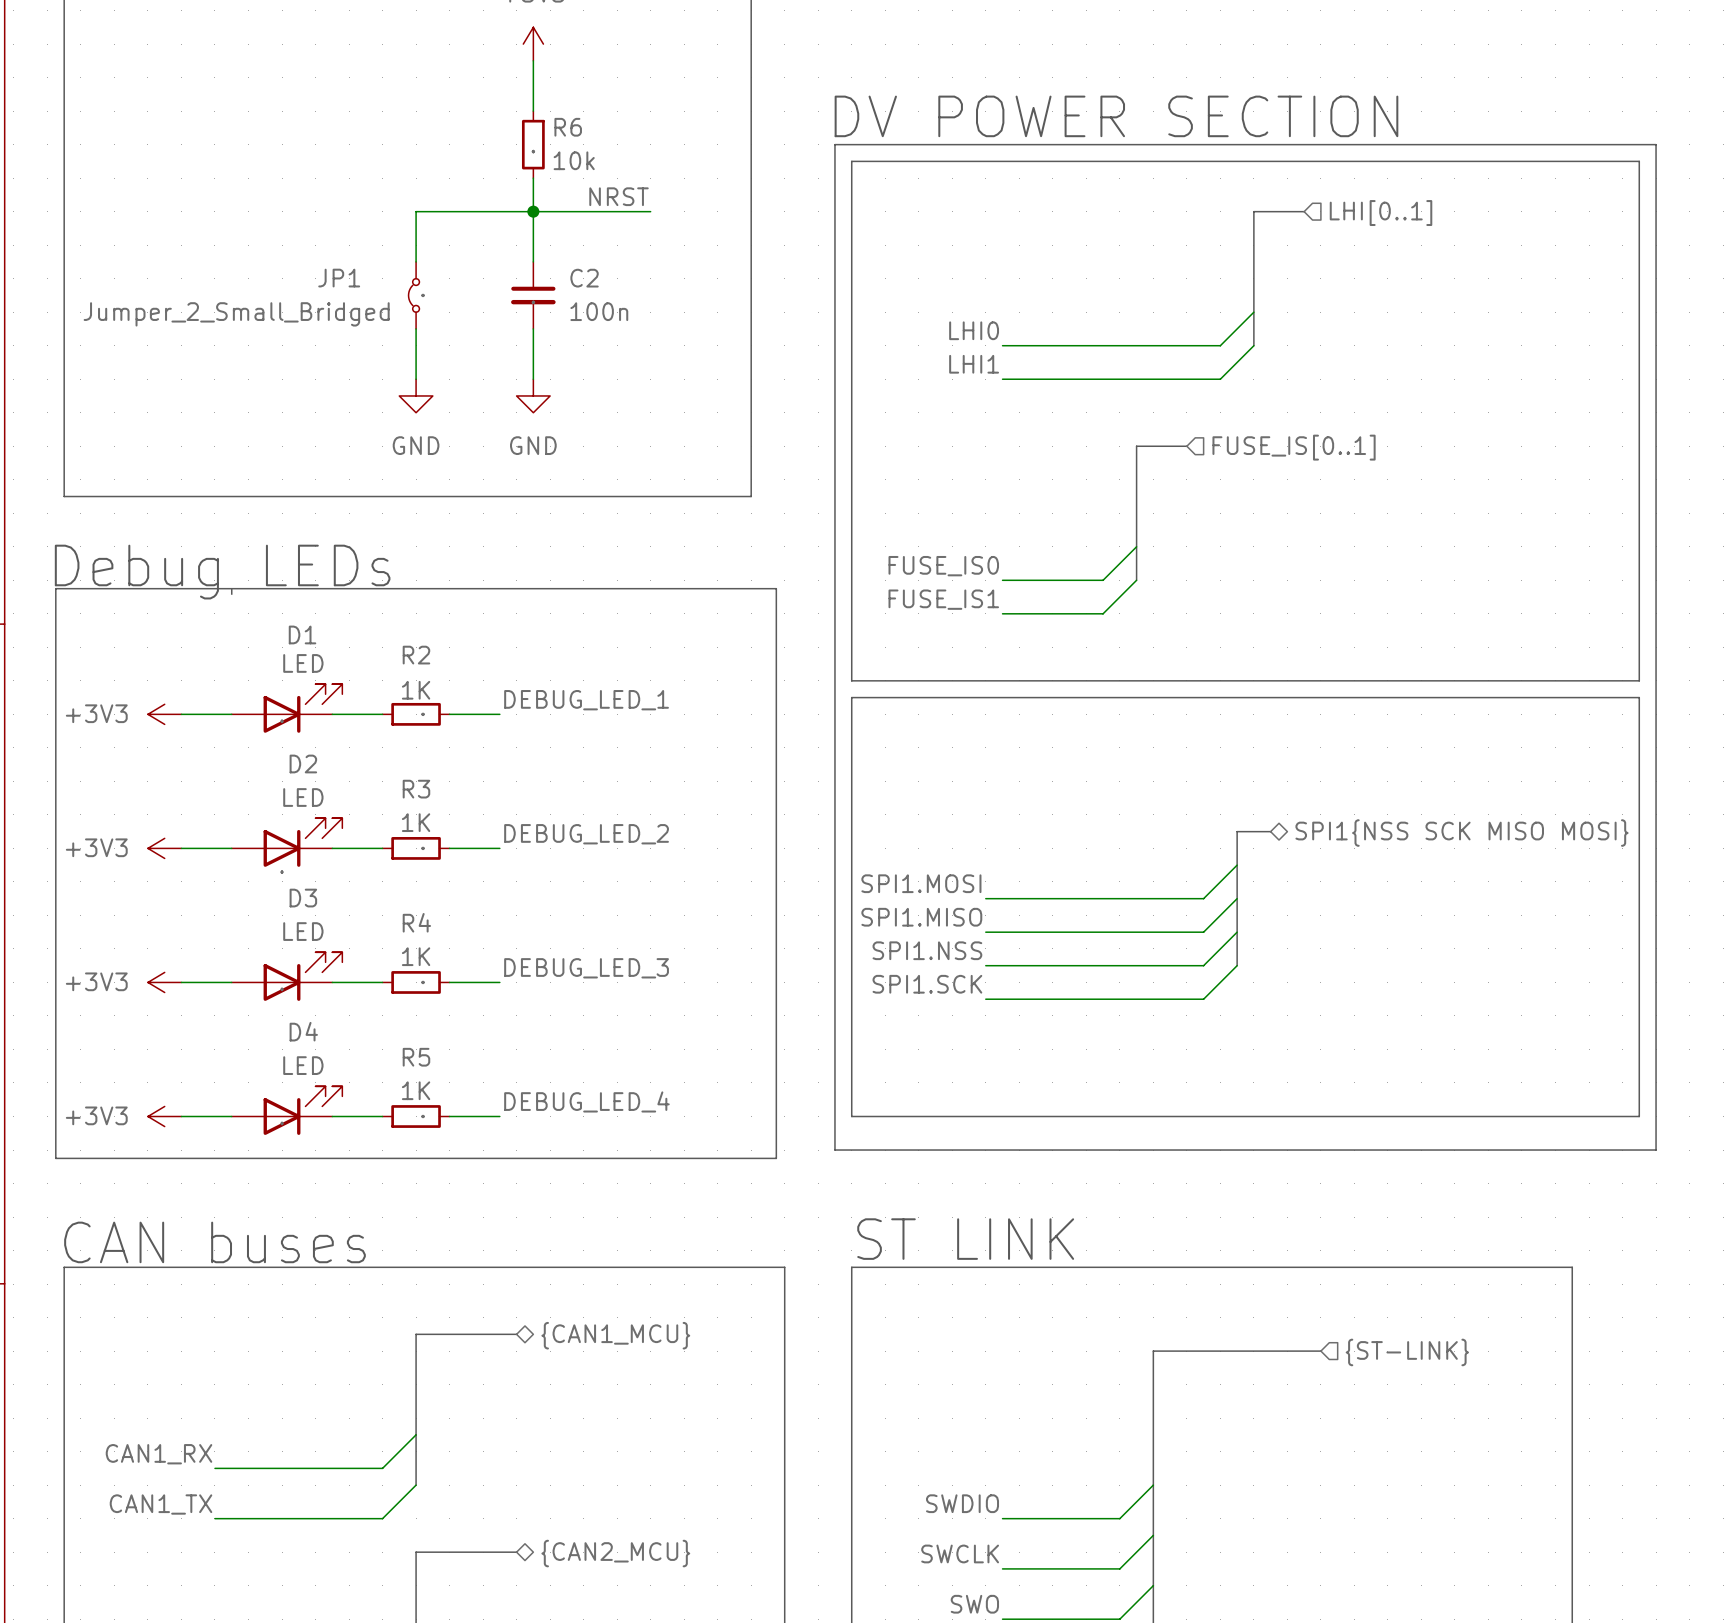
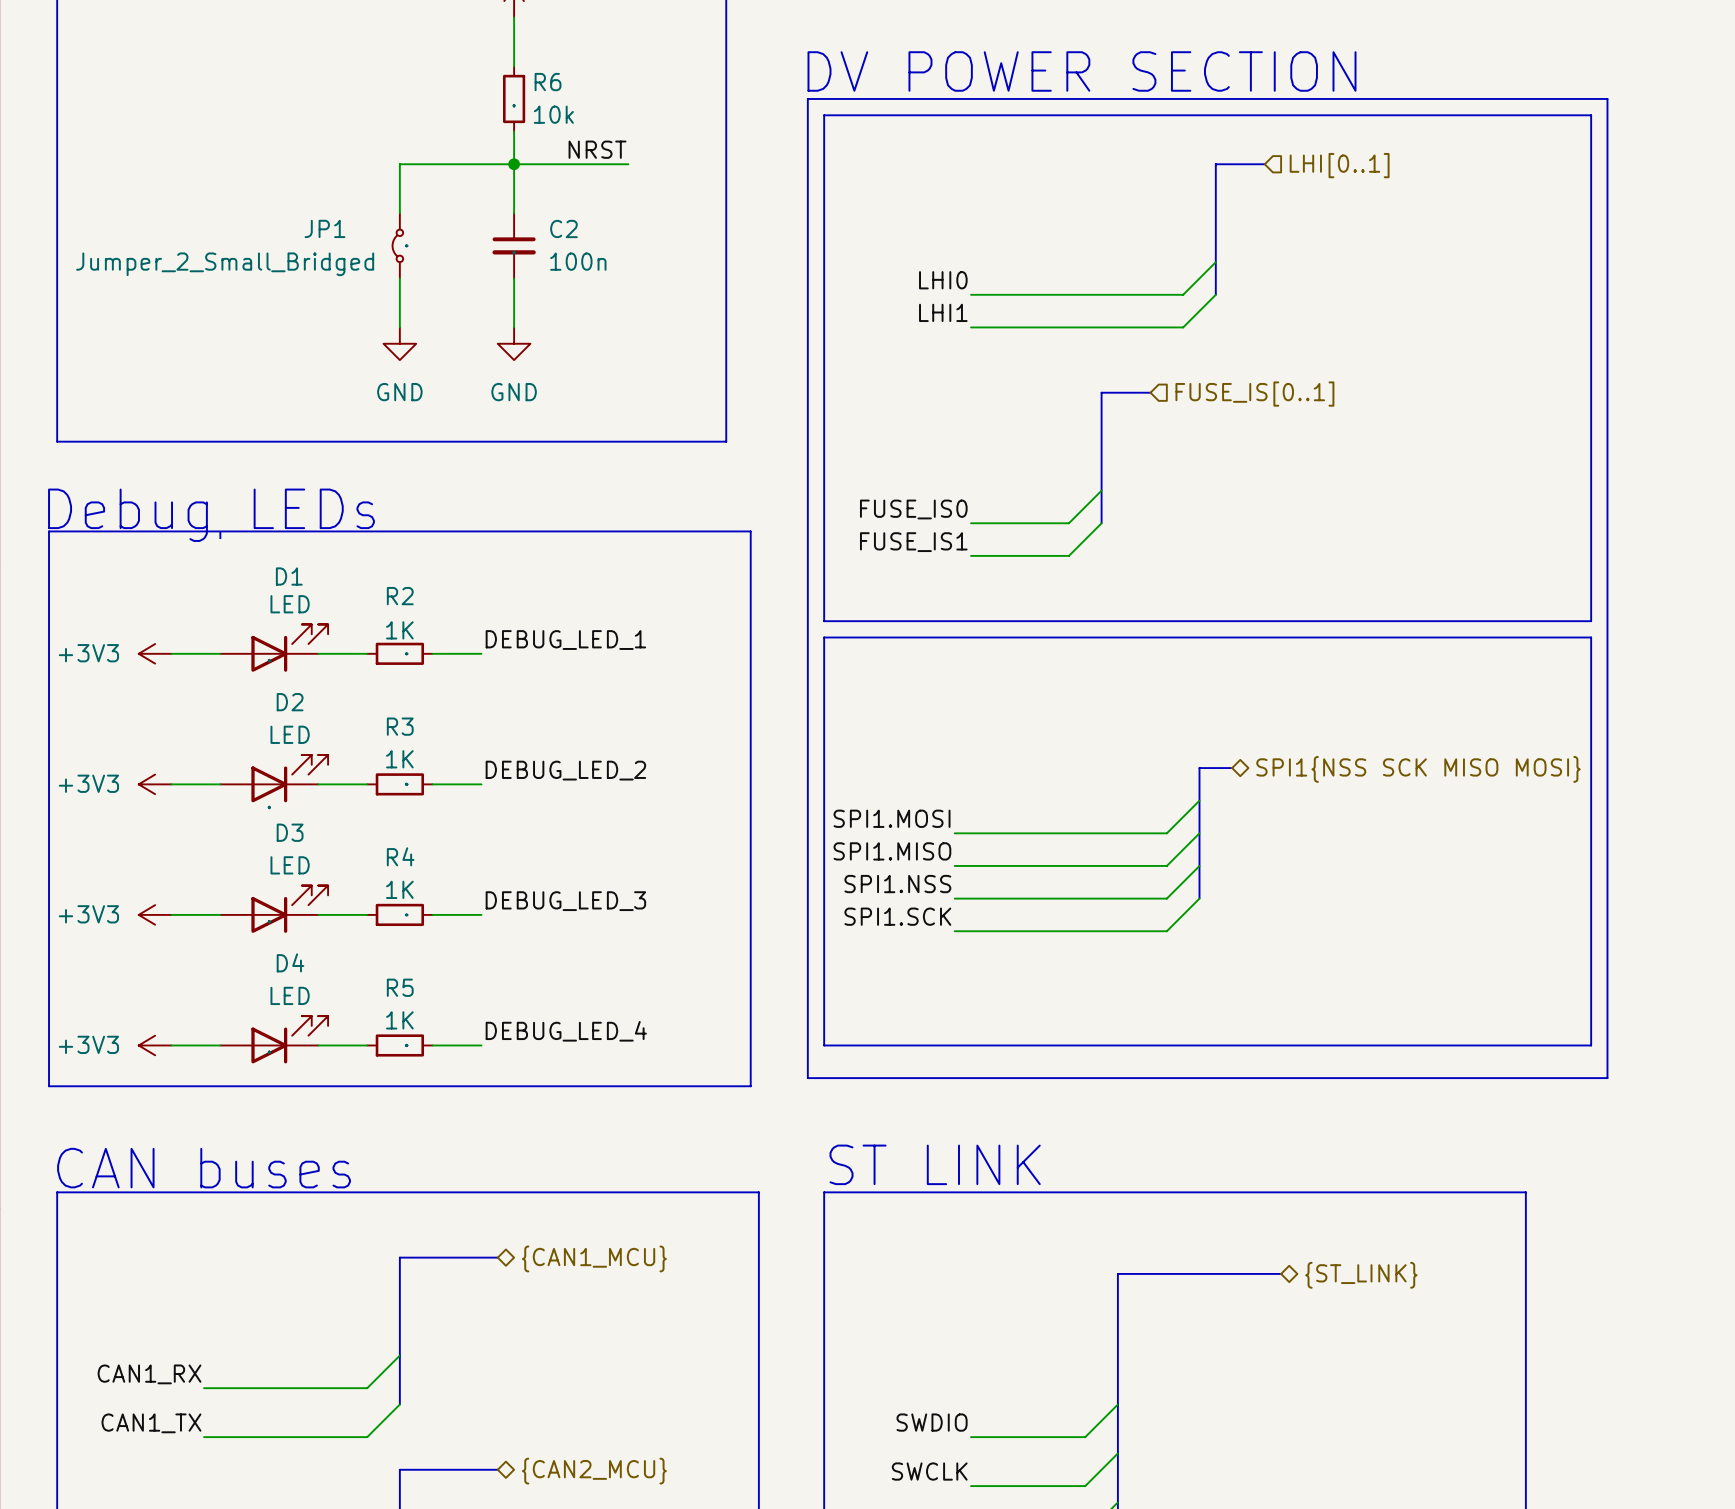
hierarchical label shape: input (1407, 1352) -> bidirectional (1361, 1275)
hierarchical label: {ST-LINK} (1407, 1352) -> {ST_LINK} (1361, 1275)

